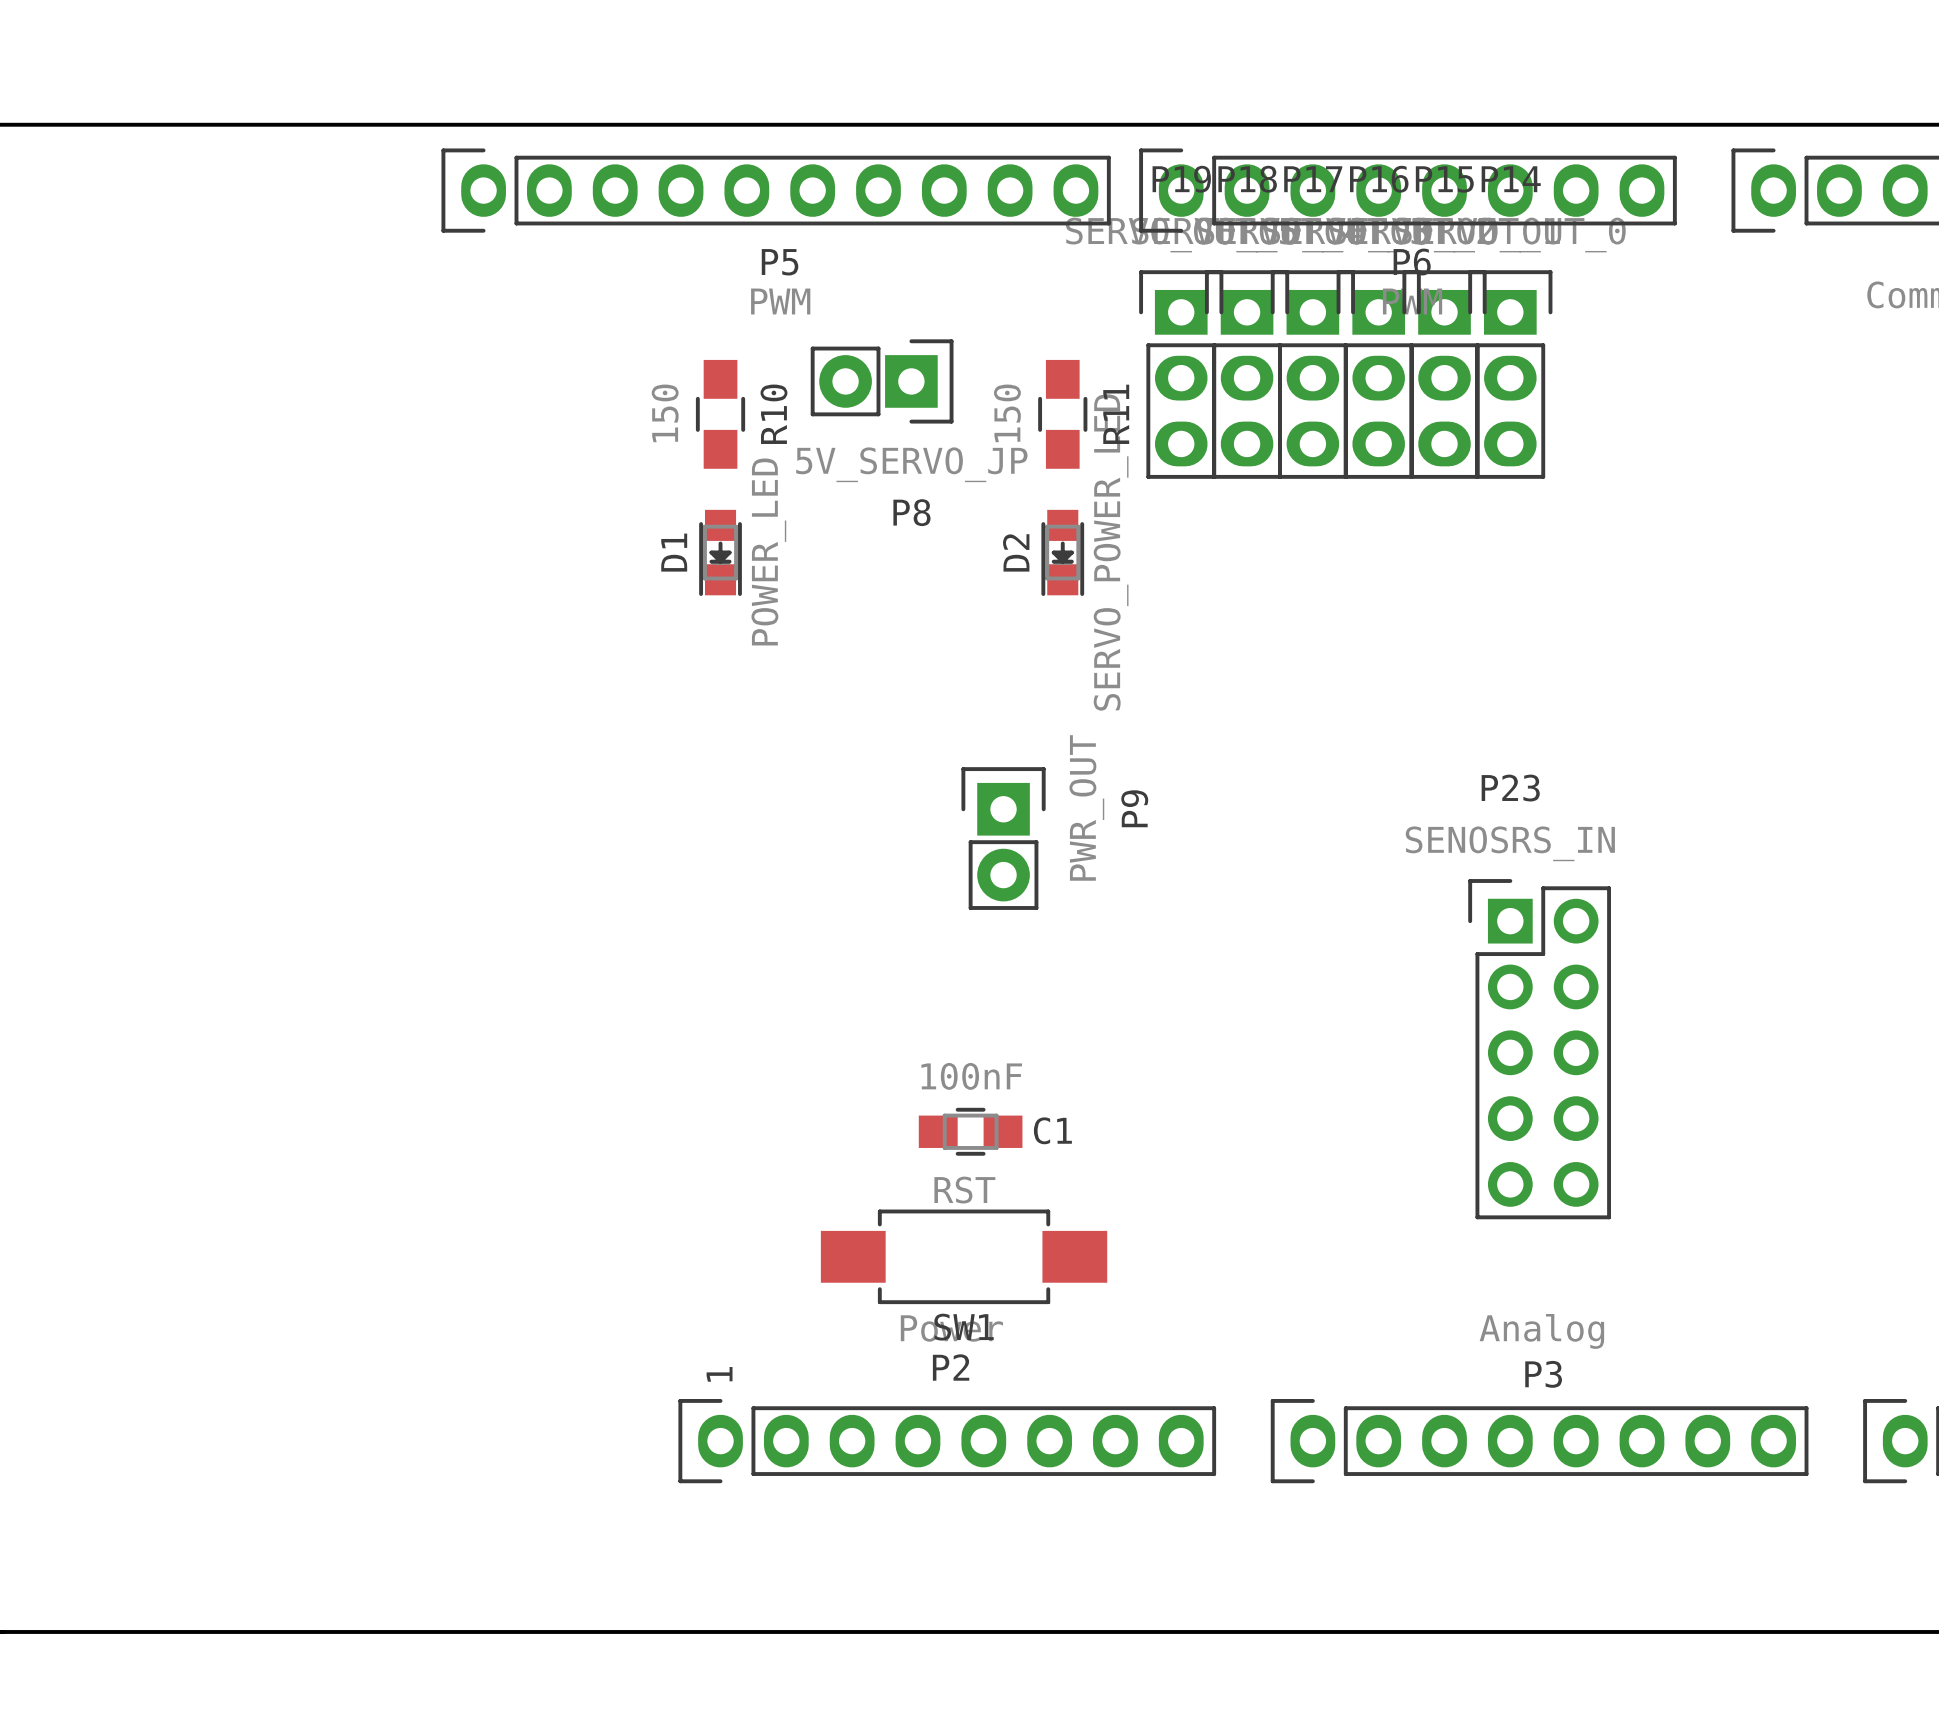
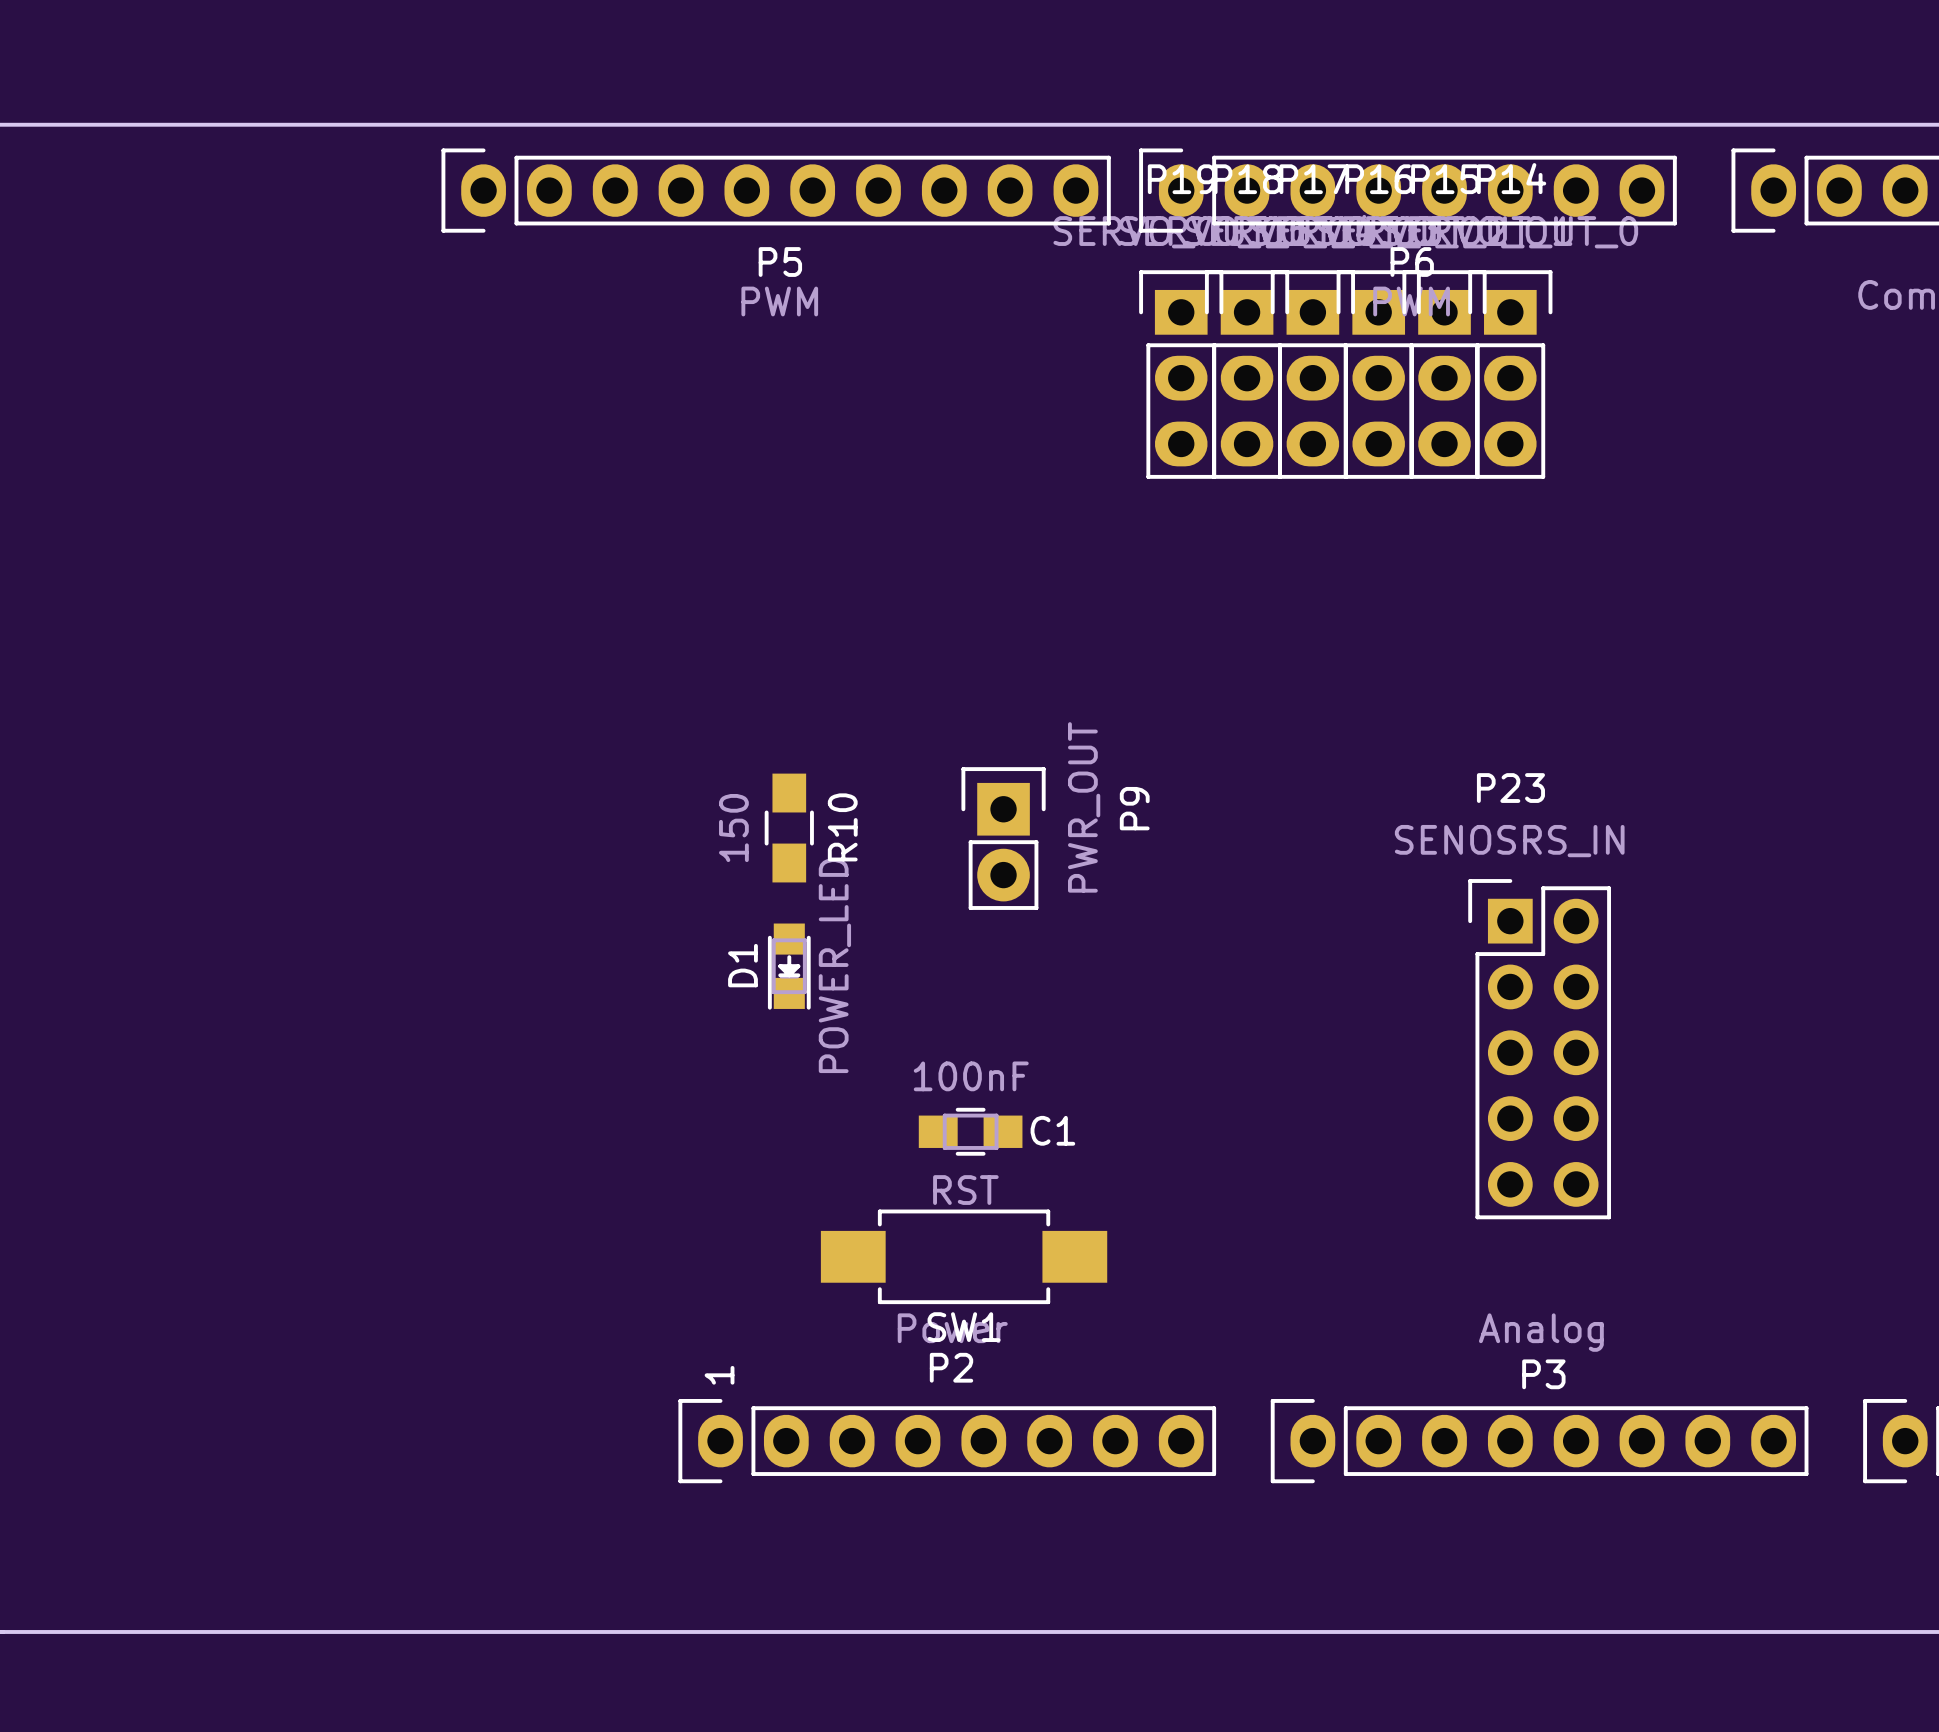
P8: 5V_SERVO_JP (882, 381) -> none
R10 position: (720, 414) -> (789, 828)
R11: 150 (1062, 414) -> none
D1 position: (720, 552) -> (789, 966)
D2: SERVO_POWER_LED (1062, 552) -> none

